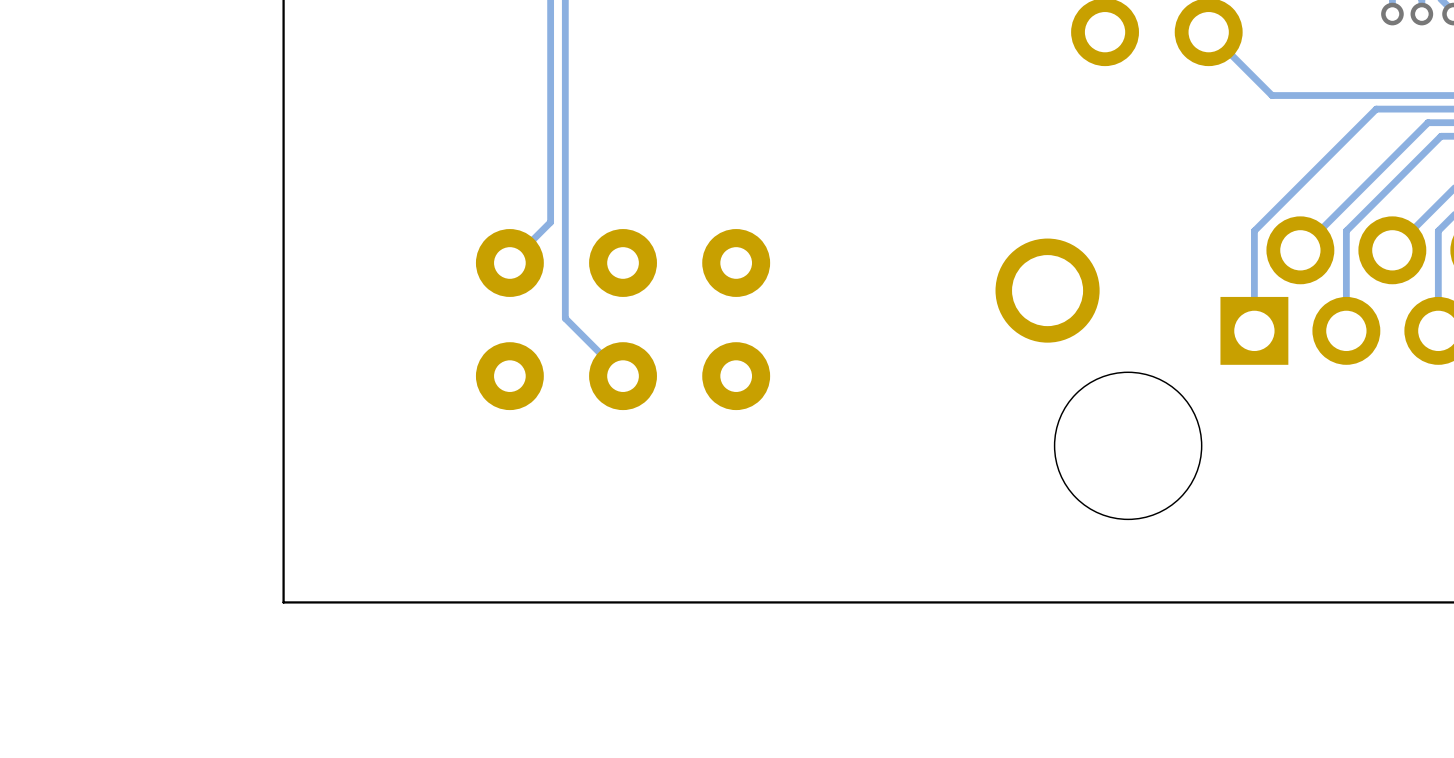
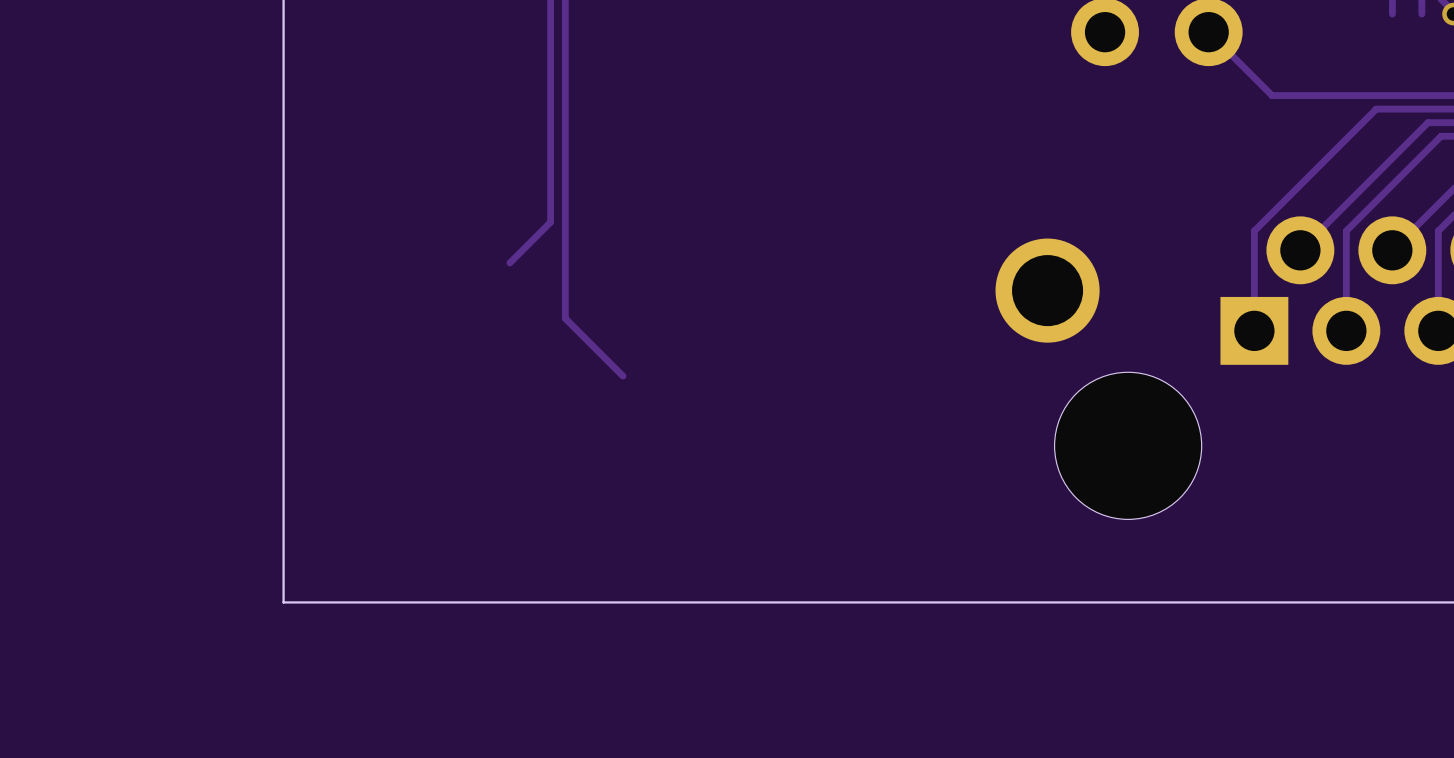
via: (1392, 14) -> none
via: (1421, 14) -> none
part: (509, 262) -> none
part: (623, 262) -> none
part: (736, 262) -> none
part: (509, 376) -> none
part: (623, 376) -> none
part: (736, 376) -> none

